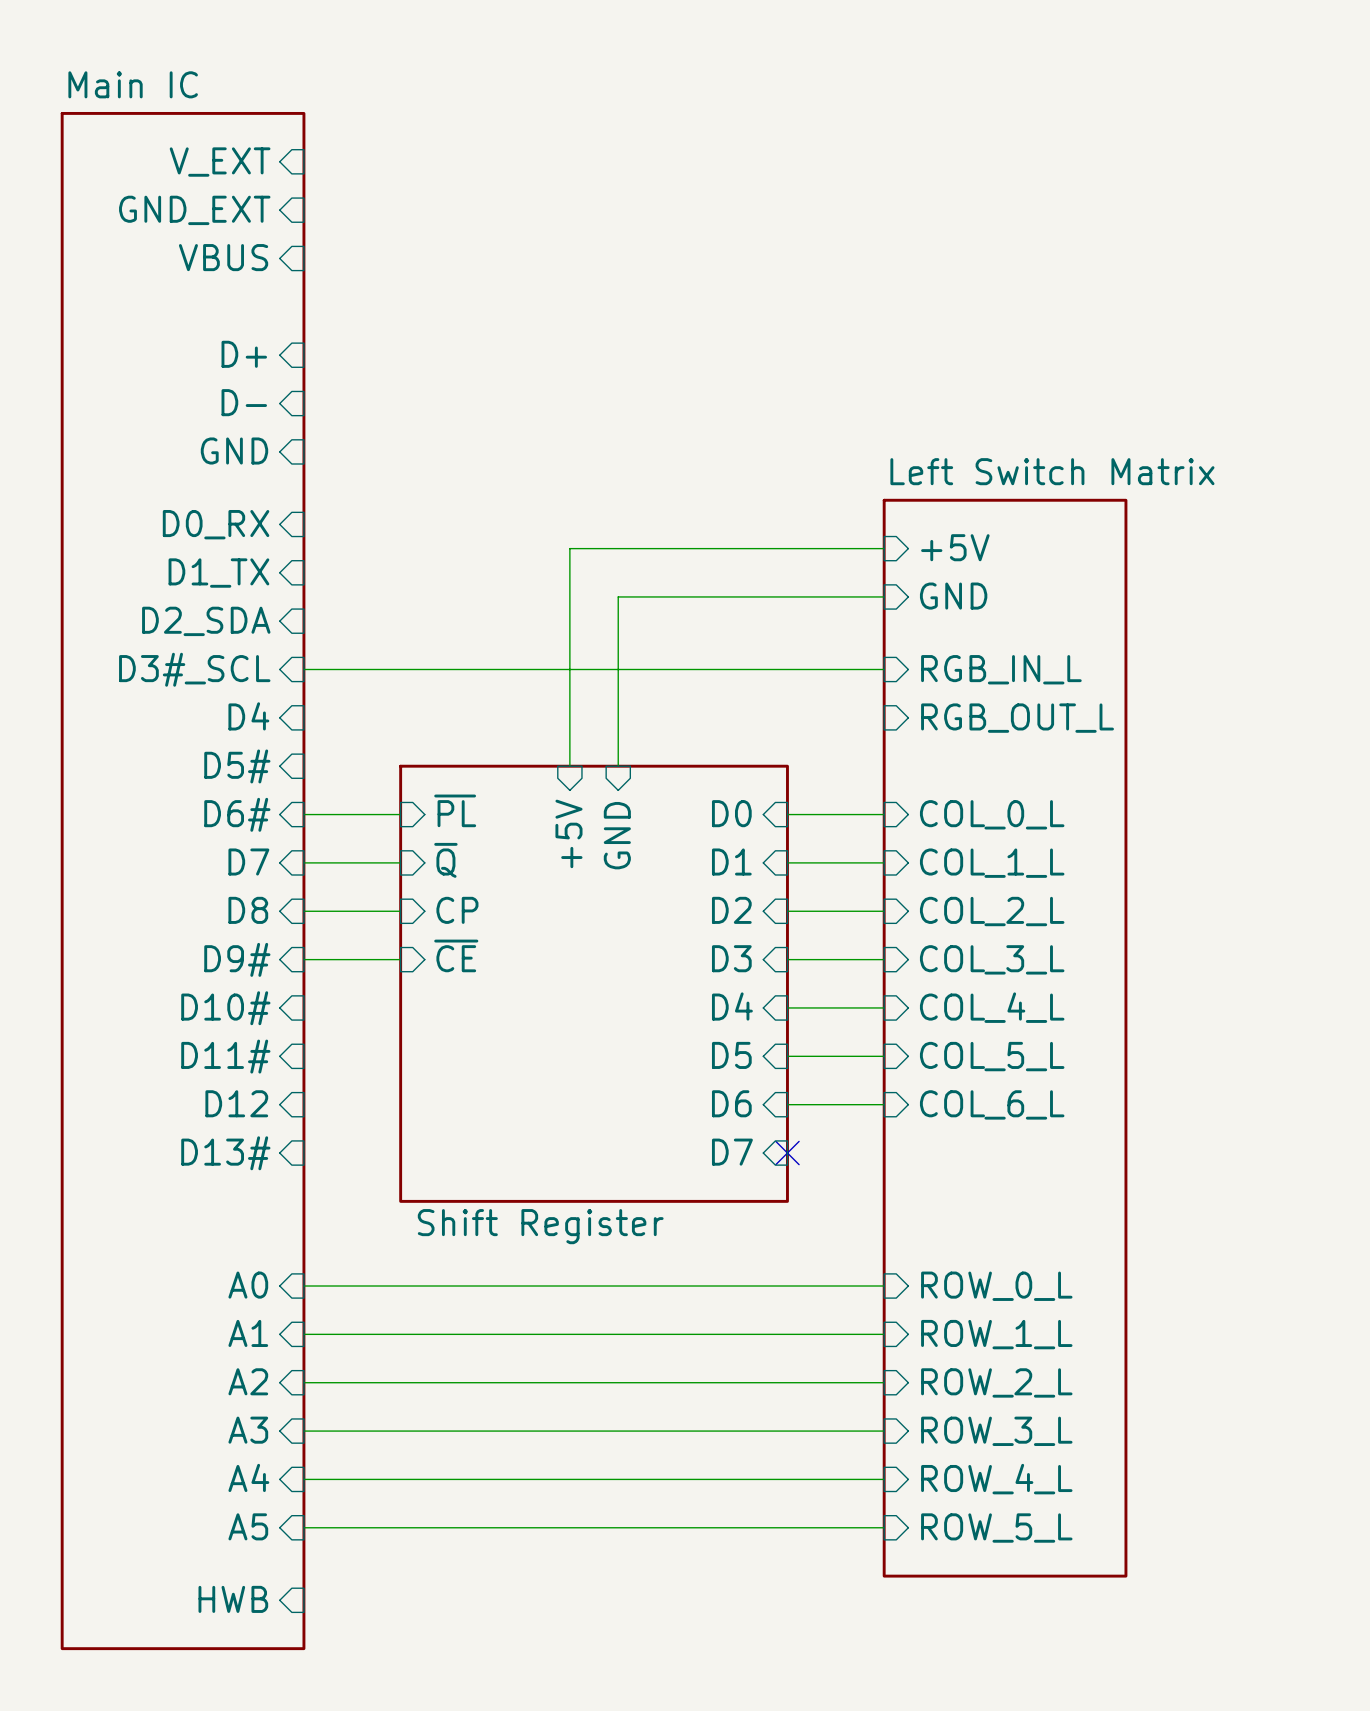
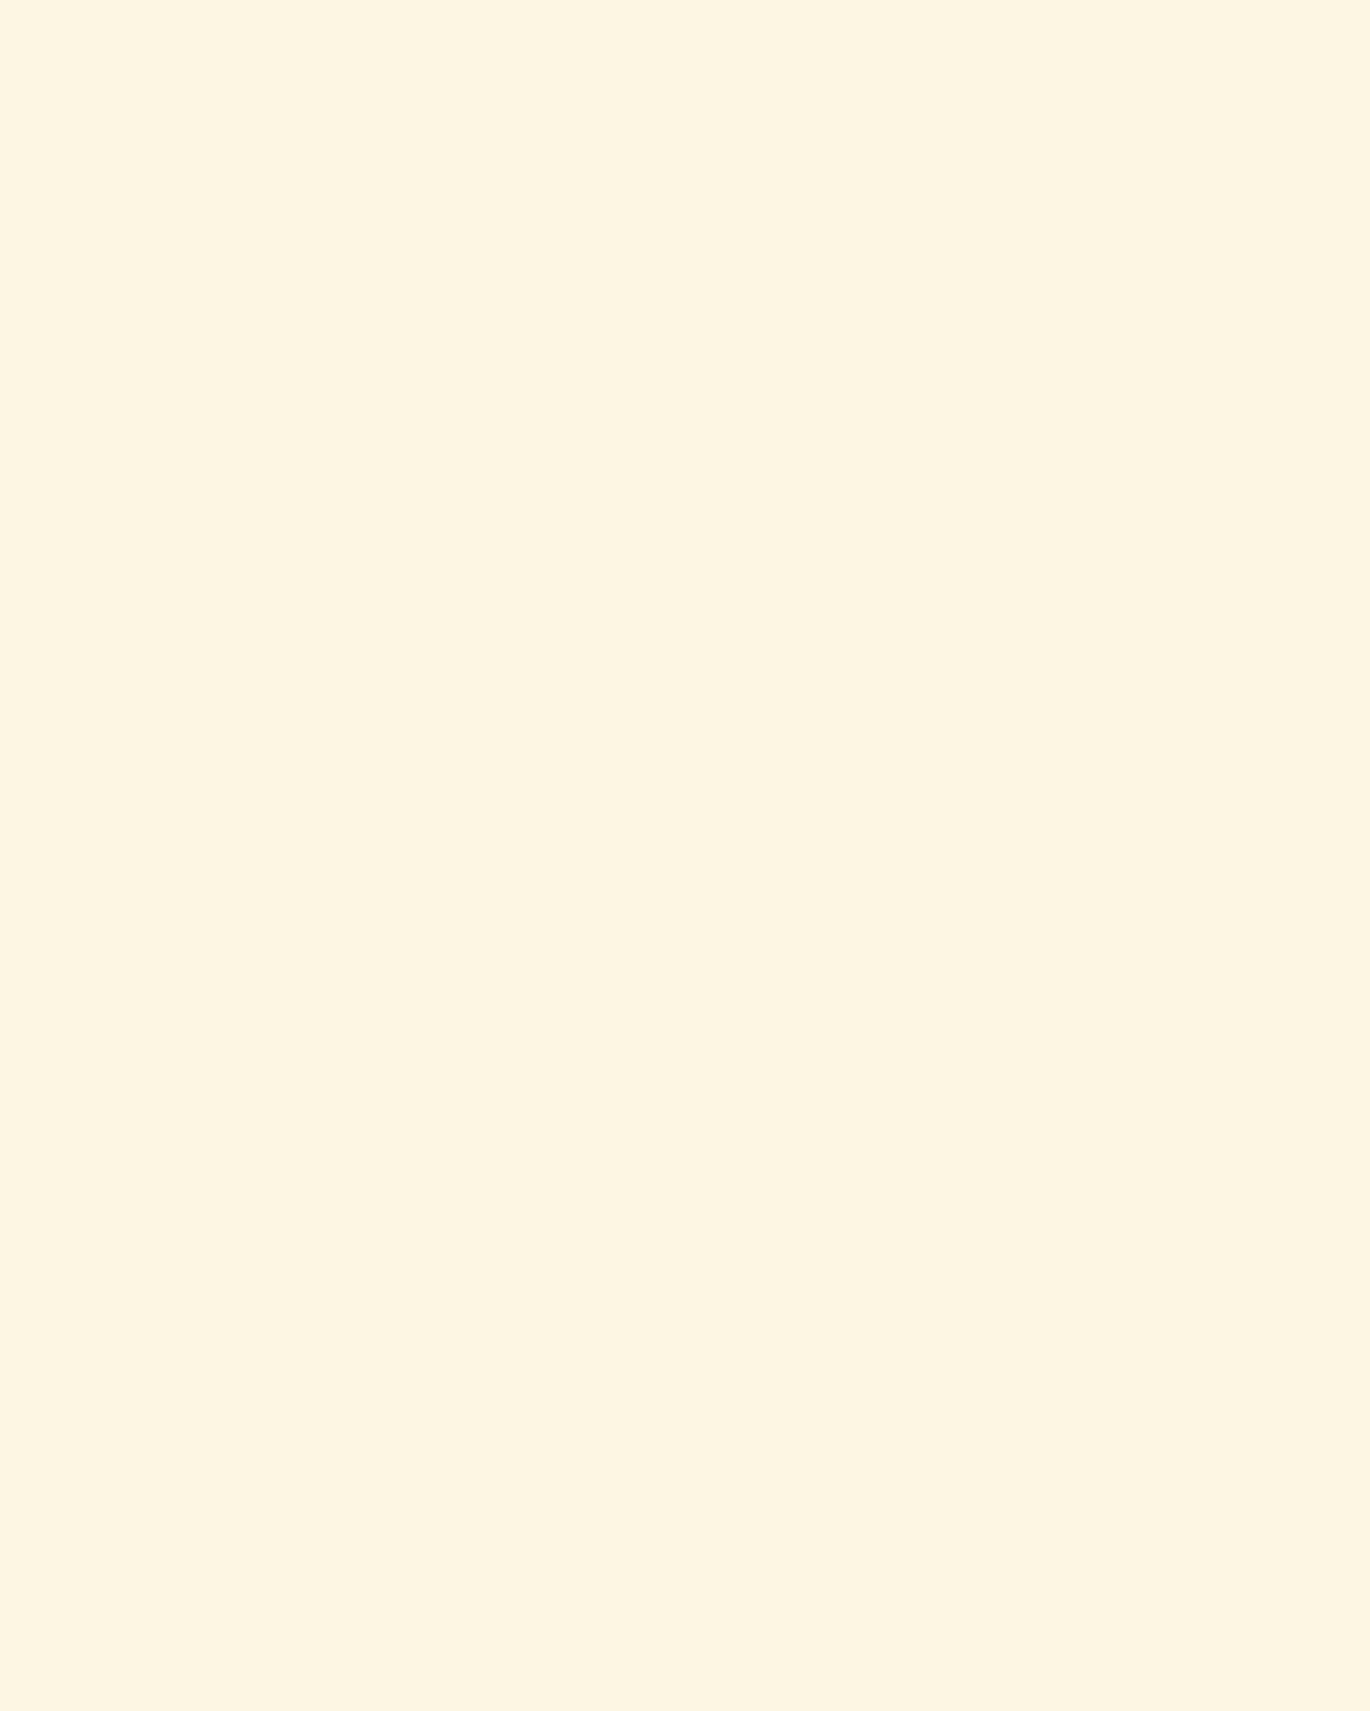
sheet pin: V_EXT (220, 162) -> none
sheet pin: GND_EXT (194, 210) -> none
sheet pin: VBUS (223, 257) -> none
sheet pin: D+ (244, 354) -> none
sheet pin: D- (244, 402) -> none
sheet pin: GND (234, 451) -> none
sheet pin: D0_RX (216, 524) -> none
sheet pin: +5V (955, 547) -> none
wire: (884, 548) (569, 548) (569, 766) -> none
sheet pin: D1_TX (218, 573) -> none
wire: (884, 596) (618, 596) (618, 766) -> none
sheet pin: GND (953, 596) -> none
sheet pin: D2_SDA (206, 621) -> none
sheet pin: D3#_SCL (194, 669) -> none
wire: (303, 669) (884, 669) -> none
sheet pin: RGB_IN_L (1001, 669) -> none
sheet pin: D4 (248, 716) -> none
sheet pin: RGB_OUT_L (1017, 718) -> none
sheet pin: D5# (237, 766) -> none
sheet pin: ~{PL} (455, 810) -> none
sheet pin: D0 (731, 813) -> none
sheet pin: D6# (237, 814) -> none
wire: (303, 814) (400, 814) -> none
wire: (787, 814) (884, 814) -> none
sheet pin: COL_0_L (992, 814) -> none
sheet pin: +5V (568, 833) -> none
sheet pin: GND (617, 835) -> none
sheet pin: ~{Q} (445, 860) -> none
sheet pin: D7 (248, 862) -> none
wire: (303, 862) (400, 862) -> none
sheet pin: D1 (731, 862) -> none
wire: (787, 862) (884, 862) -> none
sheet pin: COL_1_L (992, 863) -> none
sheet Main IC: (183, 881) -> none
sheet pin: D8 (248, 910) -> none
sheet pin: CP (457, 910) -> none
sheet pin: D2 (731, 910) -> none
wire: (303, 911) (400, 911) -> none
wire: (787, 911) (884, 911) -> none
sheet pin: COL_2_L (992, 911) -> none
sheet pin: ~{CE} (456, 955) -> none
sheet pin: D3 (731, 958) -> none
sheet pin: D9# (237, 959) -> none
wire: (303, 959) (400, 959) -> none
wire: (787, 959) (884, 959) -> none
sheet pin: COL_3_L (992, 959) -> none
sheet Shift Register: (594, 983) -> none
sheet pin: D4 (732, 1006) -> none
wire: (787, 1007) (884, 1007) -> none
sheet pin: COL_4_L (992, 1007) -> none
sheet pin: D10# (225, 1008) -> none
sheet Left Switch Matrix: (1005, 1038) -> none
sheet pin: D5 (731, 1055) -> none
sheet pin: D11# (225, 1056) -> none
wire: (787, 1056) (884, 1056) -> none
sheet pin: COL_5_L (992, 1056) -> none
sheet pin: D12 (236, 1103) -> none
sheet pin: D6 (731, 1103) -> none
wire: (787, 1104) (884, 1104) -> none
sheet pin: COL_6_L (992, 1104) -> none
sheet pin: D7 (732, 1152) -> none
sheet pin: D13# (225, 1153) -> none
no-connect mark: (787, 1153) -> none
sheet pin: A0 (248, 1285) -> none
wire: (303, 1286) (884, 1286) -> none
sheet pin: ROW_0_L (996, 1286) -> none
sheet pin: A1 (248, 1333) -> none
wire: (303, 1334) (884, 1334) -> none
sheet pin: ROW_1_L (996, 1334) -> none
sheet pin: A2 (248, 1381) -> none
wire: (303, 1382) (884, 1382) -> none
sheet pin: ROW_2_L (996, 1382) -> none
sheet pin: A3 (248, 1430) -> none
wire: (303, 1431) (884, 1431) -> none
sheet pin: ROW_3_L (996, 1431) -> none
sheet pin: A4 (248, 1477) -> none
wire: (303, 1479) (884, 1479) -> none
sheet pin: ROW_4_L (996, 1479) -> none
sheet pin: A5 (248, 1526) -> none
wire: (303, 1527) (884, 1527) -> none
sheet pin: ROW_5_L (996, 1528) -> none
sheet pin: HWB (233, 1599) -> none

